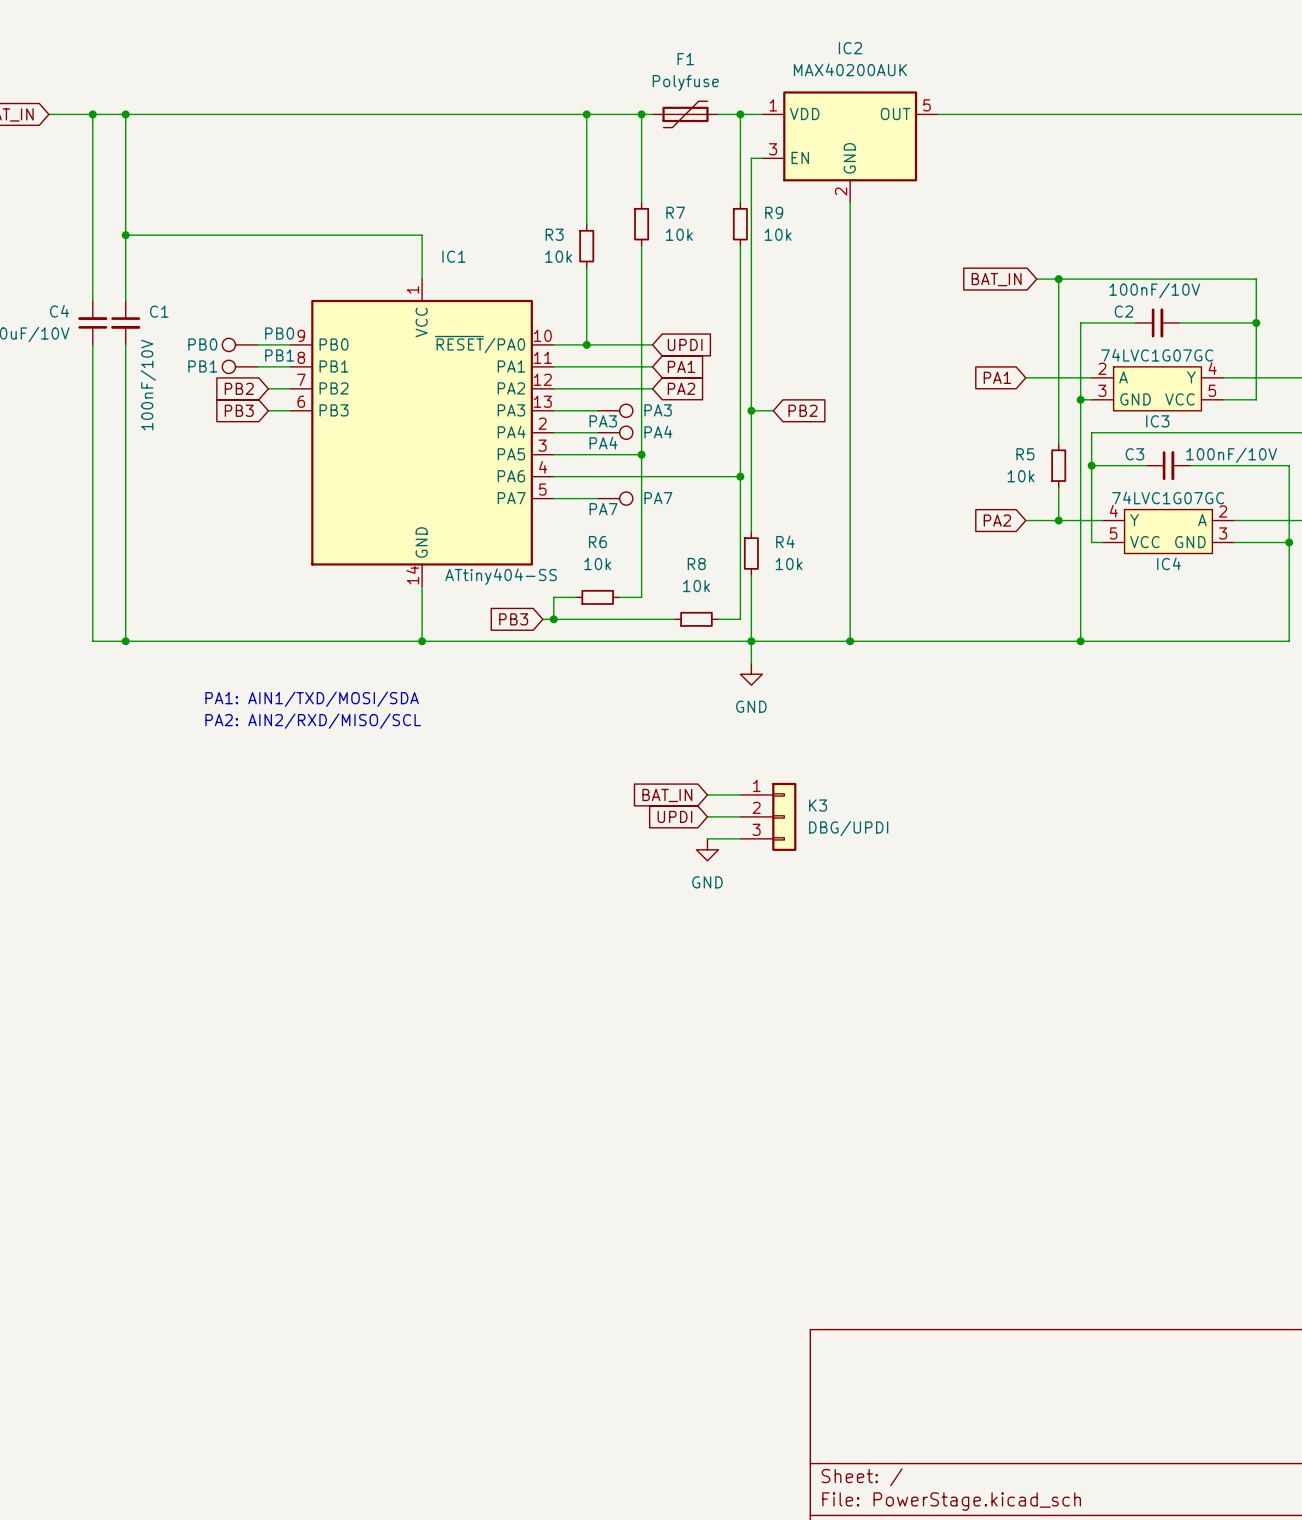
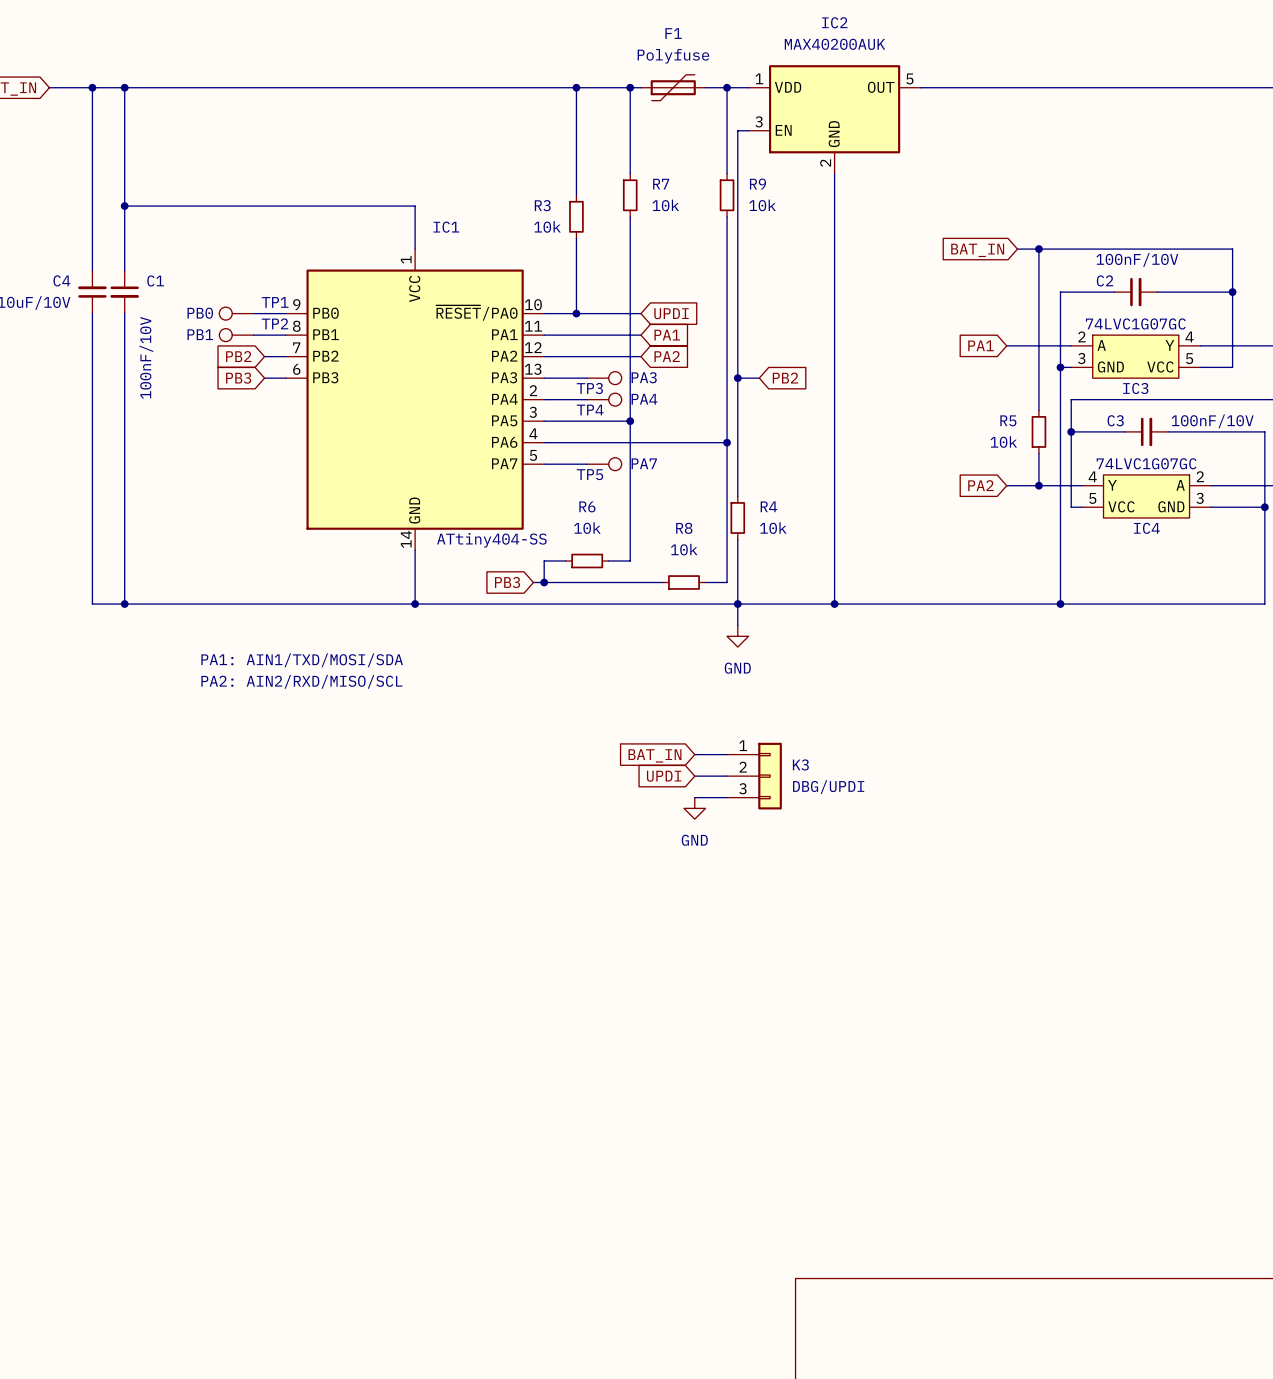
PB0 name: PB0 (279, 333) -> TP1 (275, 302)
PB1 name: PB1 (279, 355) -> TP2 (274, 323)
PA3 name: PA3 (603, 421) -> TP3 (589, 388)
PA4 name: PA4 (603, 443) -> TP4 (590, 410)
PA7 name: PA7 (603, 509) -> TP5 (589, 474)

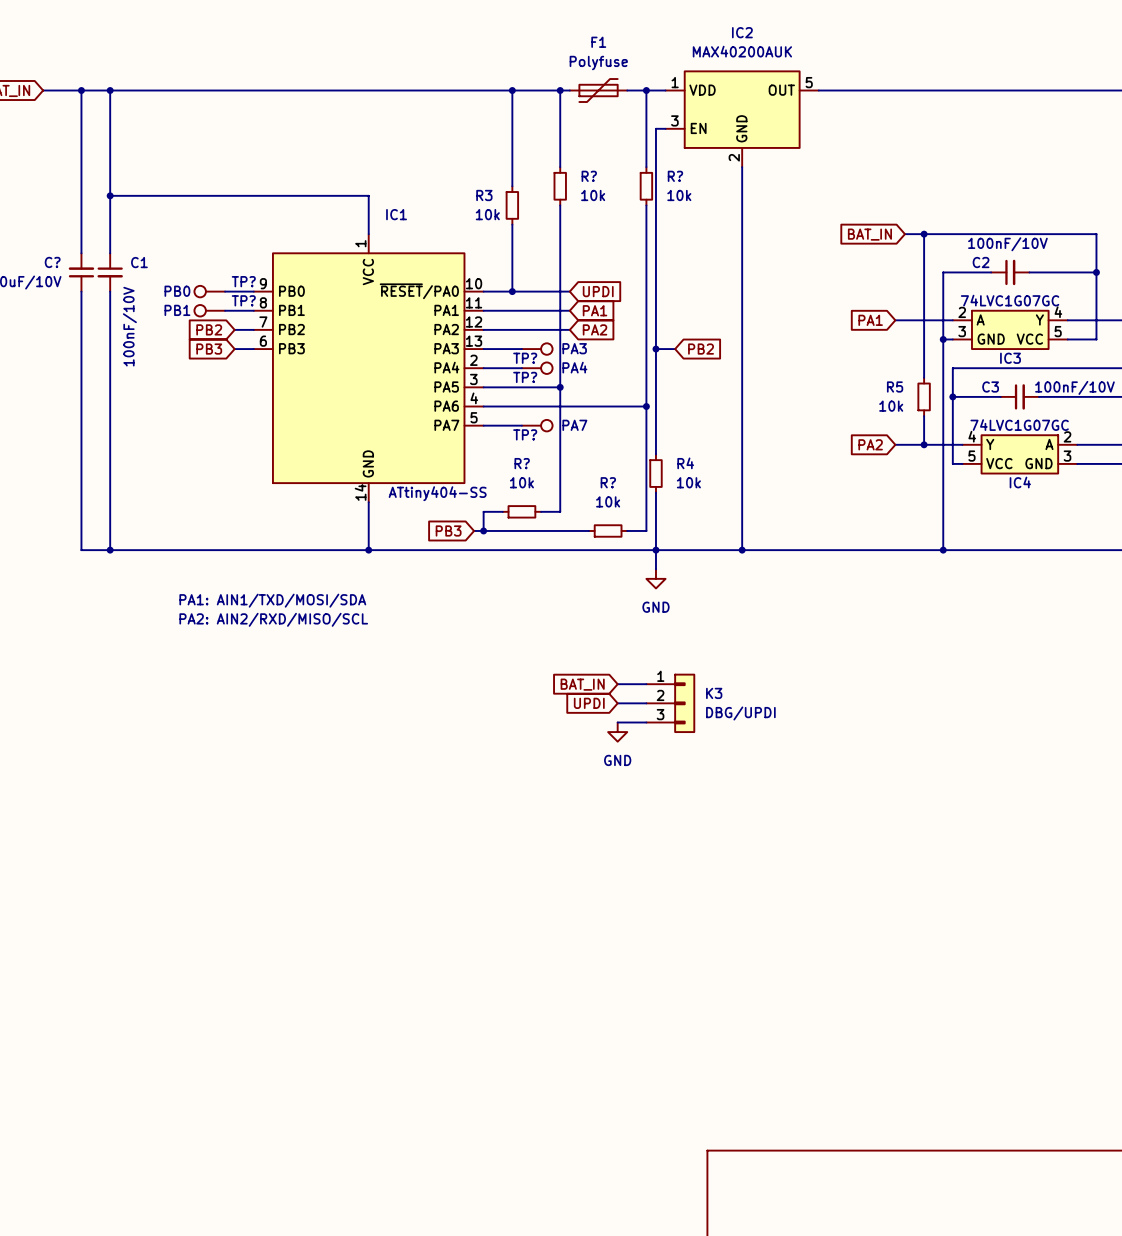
R7 name: R7 (661, 184) -> R? (589, 176)
R9 name: R9 (757, 184) -> R? (675, 176)
C4 name: C4 (61, 280) -> C? (52, 262)
TP1 name: TP1 (275, 302) -> TP? (243, 281)
TP2 name: TP2 (274, 323) -> TP? (243, 300)
TP3 name: TP3 (589, 388) -> TP? (525, 358)
TP4 name: TP4 (590, 410) -> TP? (525, 377)
TP5 name: TP5 (589, 474) -> TP? (525, 434)
R6 name: R6 (587, 506) -> R? (522, 463)
R8 name: R8 (684, 528) -> R? (608, 482)

